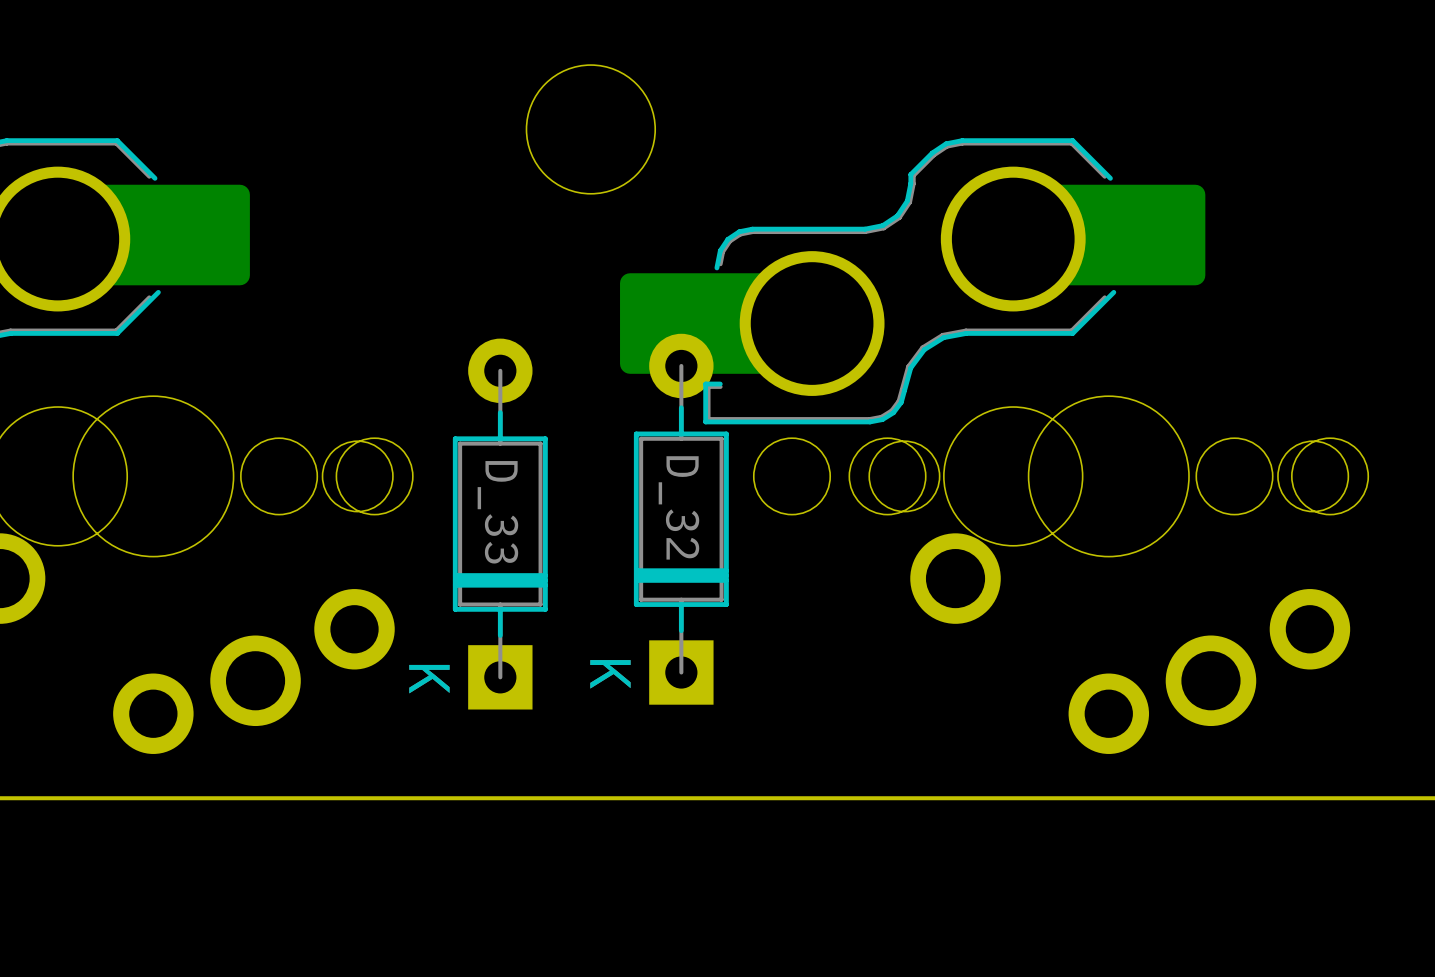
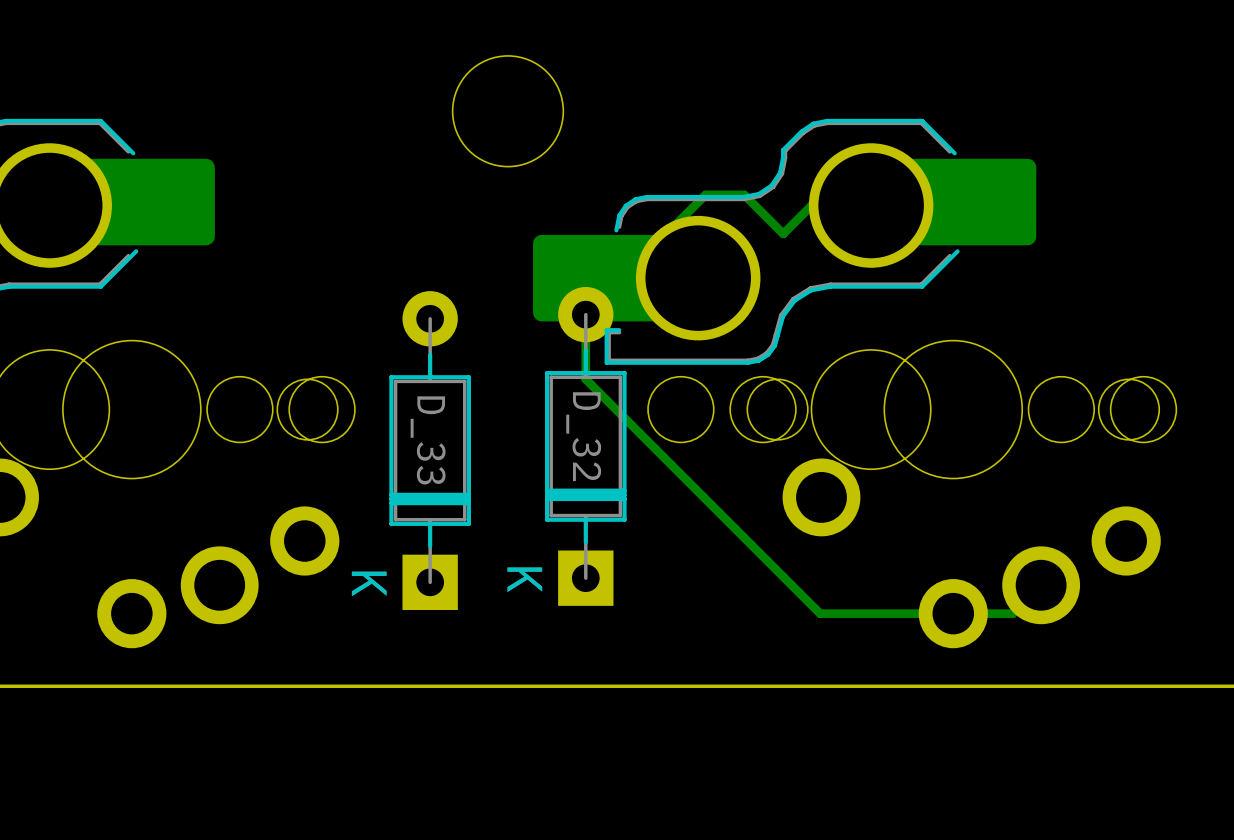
bottom track: none -> (871, 205) (811, 205) (783, 233) (744, 194) (705, 194) (585, 314) (585, 379) (820, 613) (1012, 613) (1041, 585)

